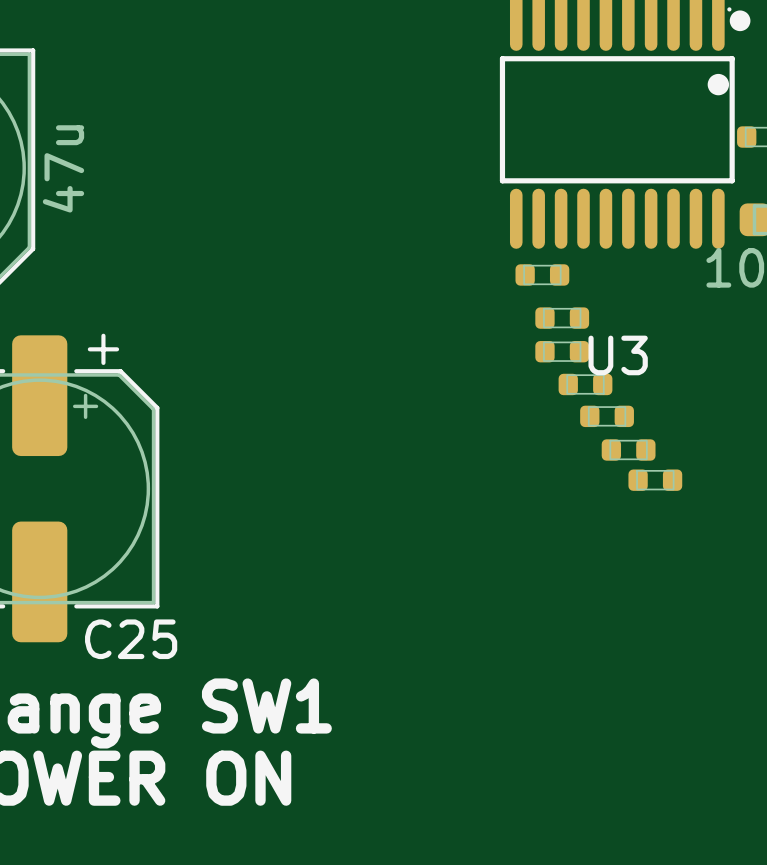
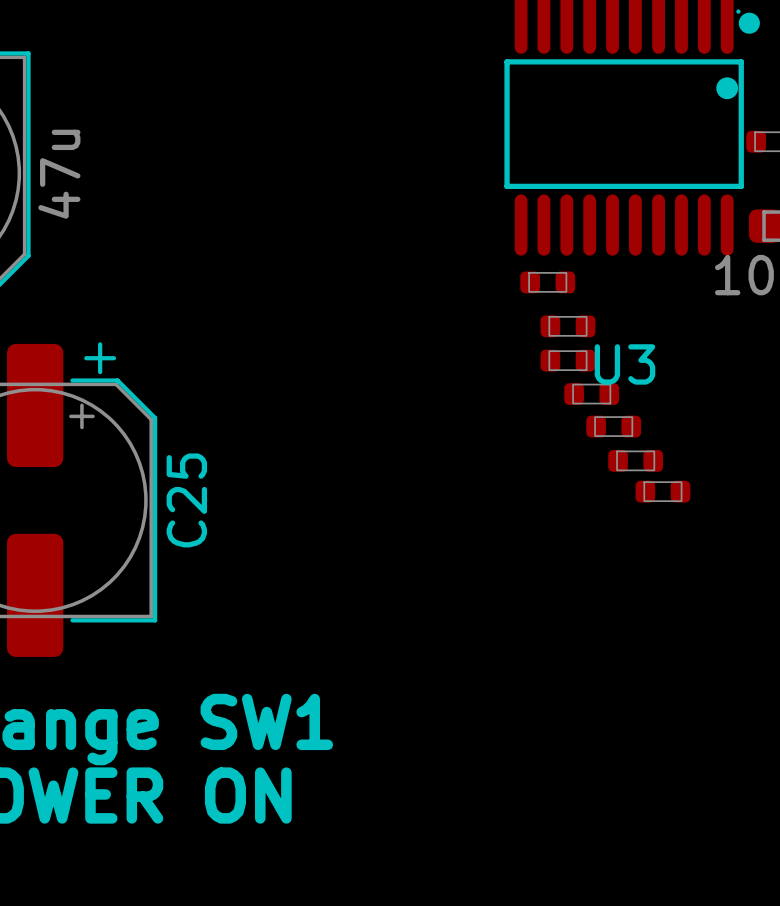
C25 name rotation: 0° (131, 639) -> 90° counterclockwise (186, 500)
C25 name position: C25 (131, 639) -> C25 (186, 500)

